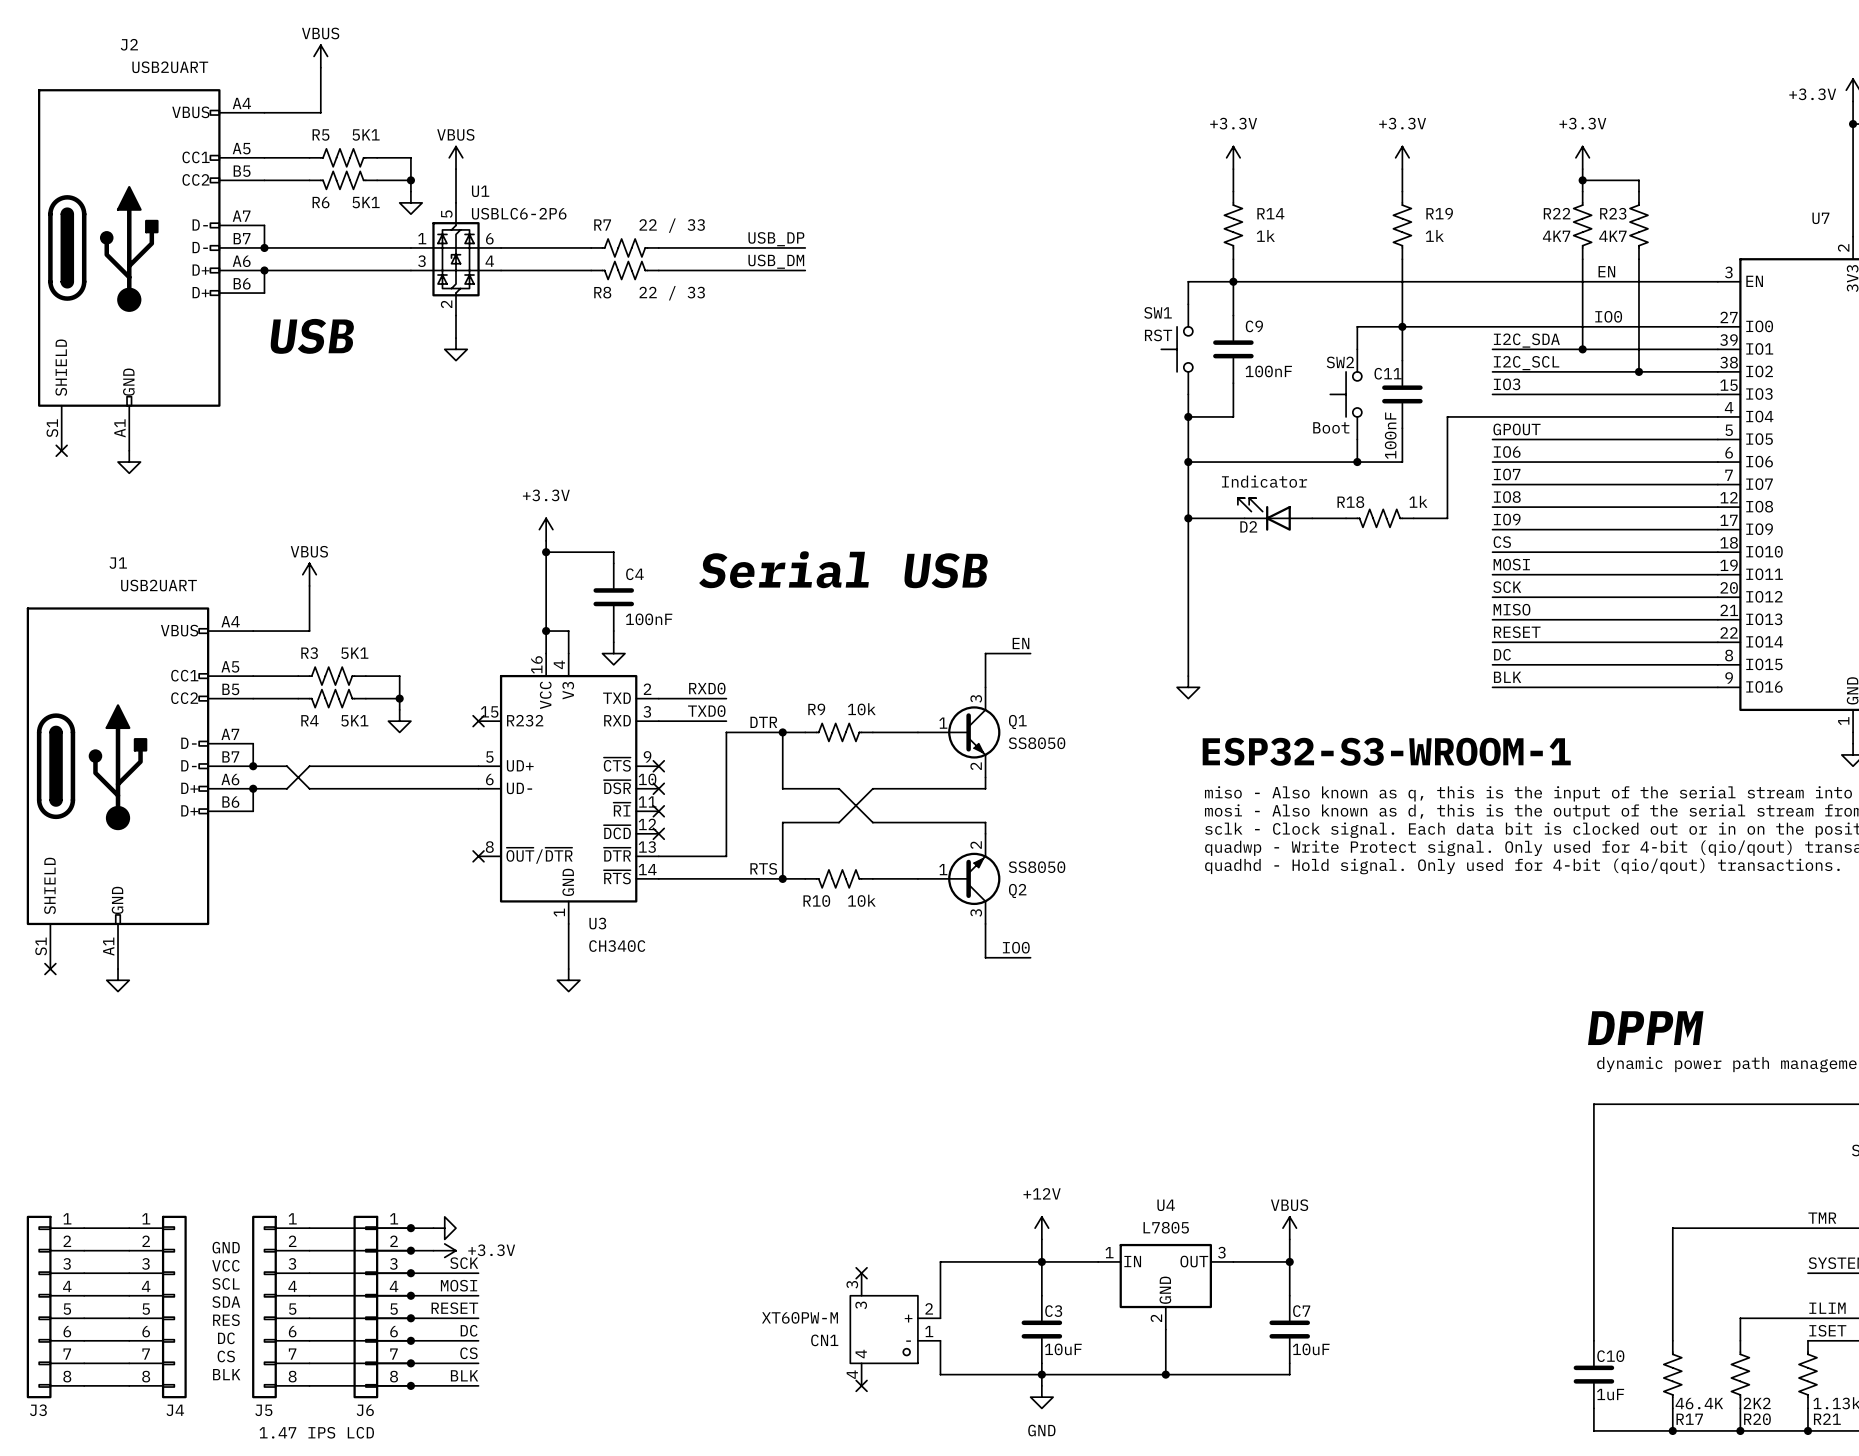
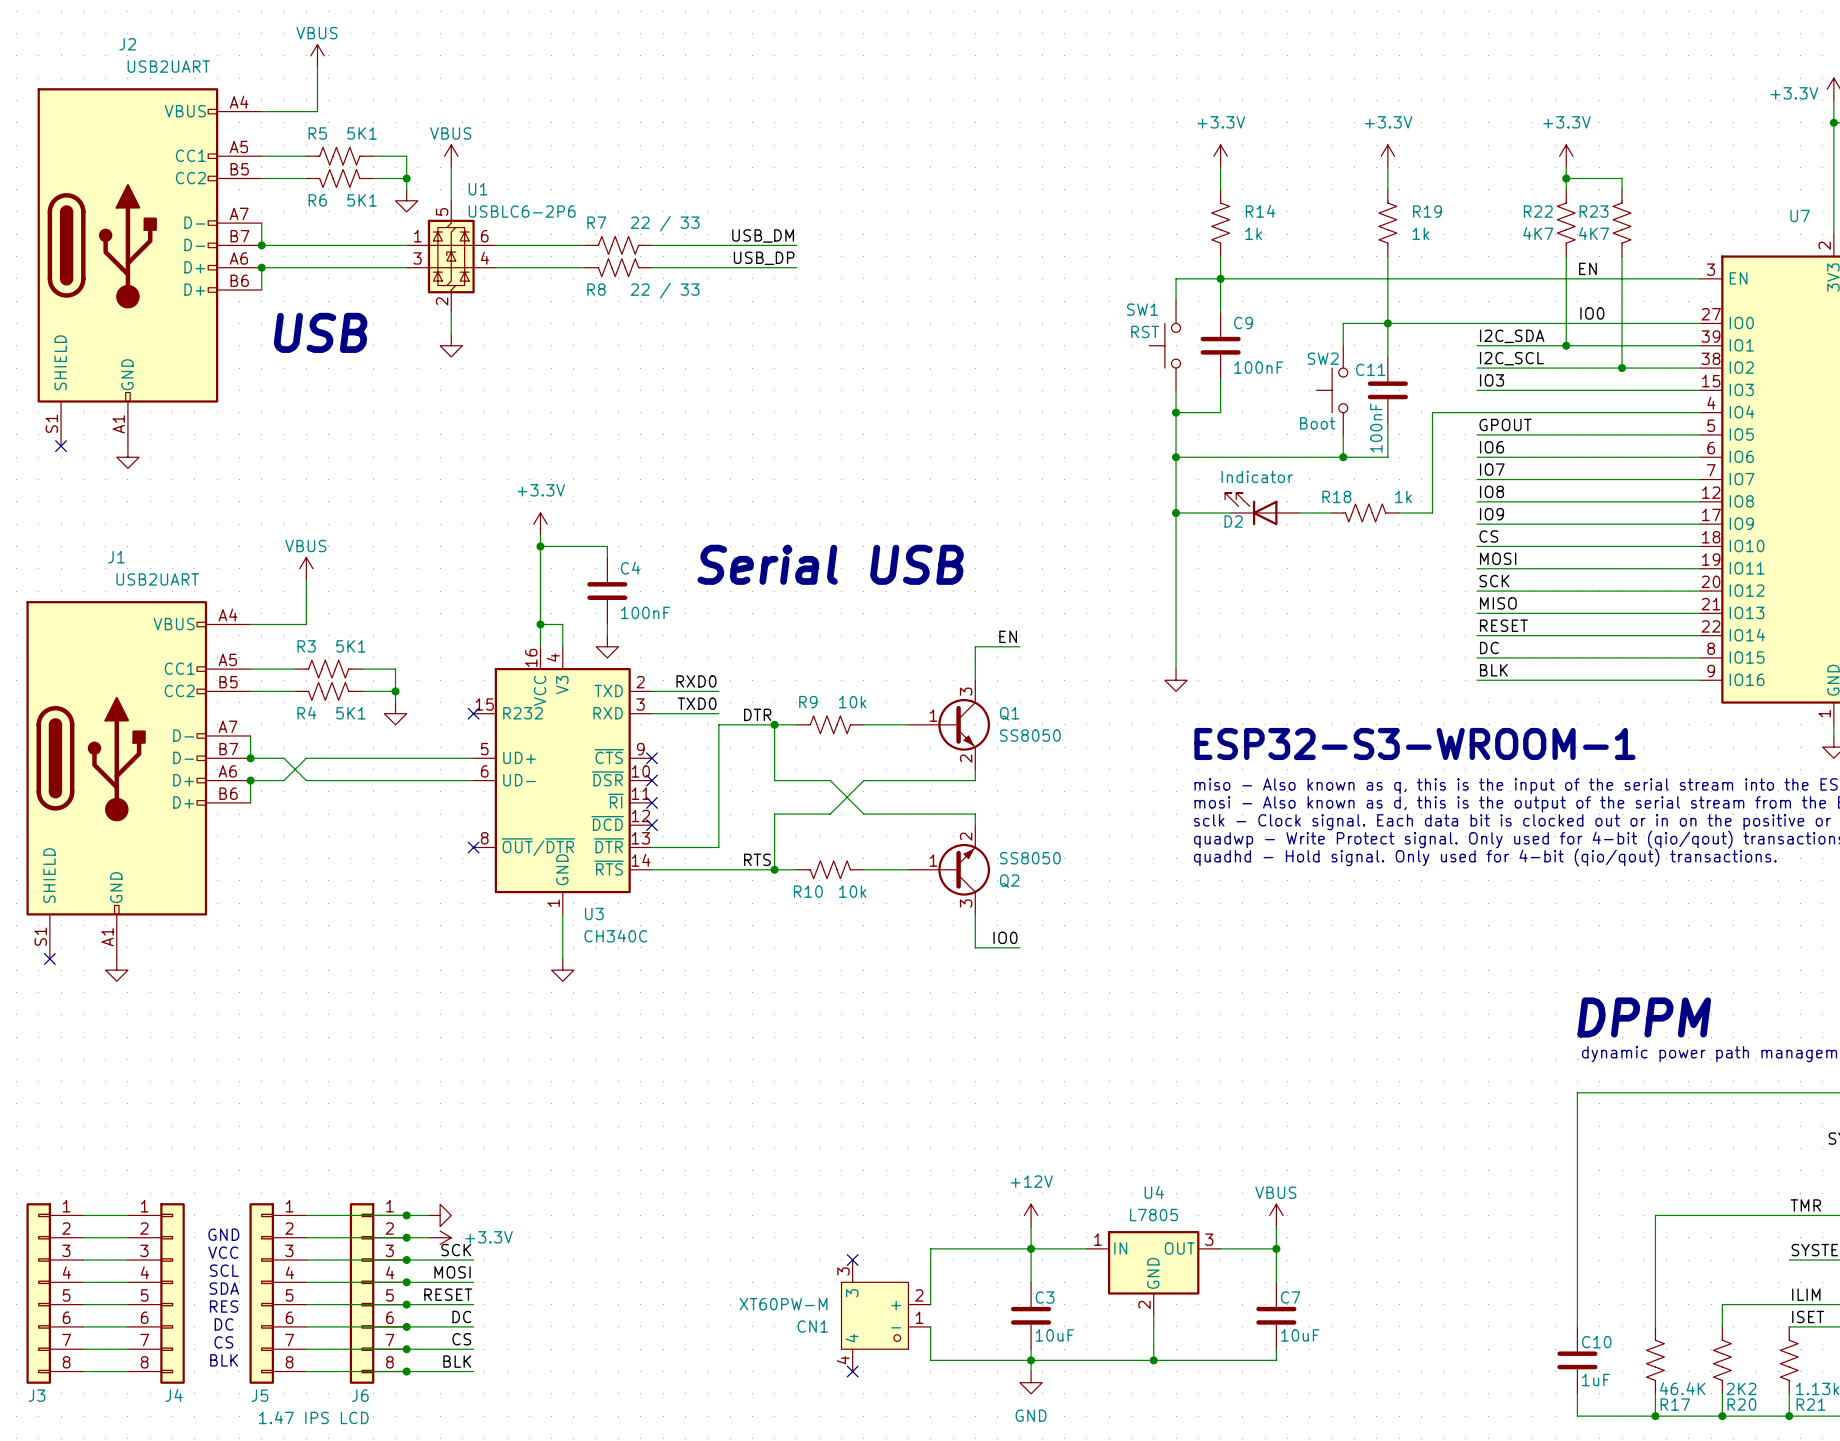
label: USB_DP (776, 239) -> USB_DM (763, 235)
label: USB_DM (776, 261) -> USB_DP (764, 258)

